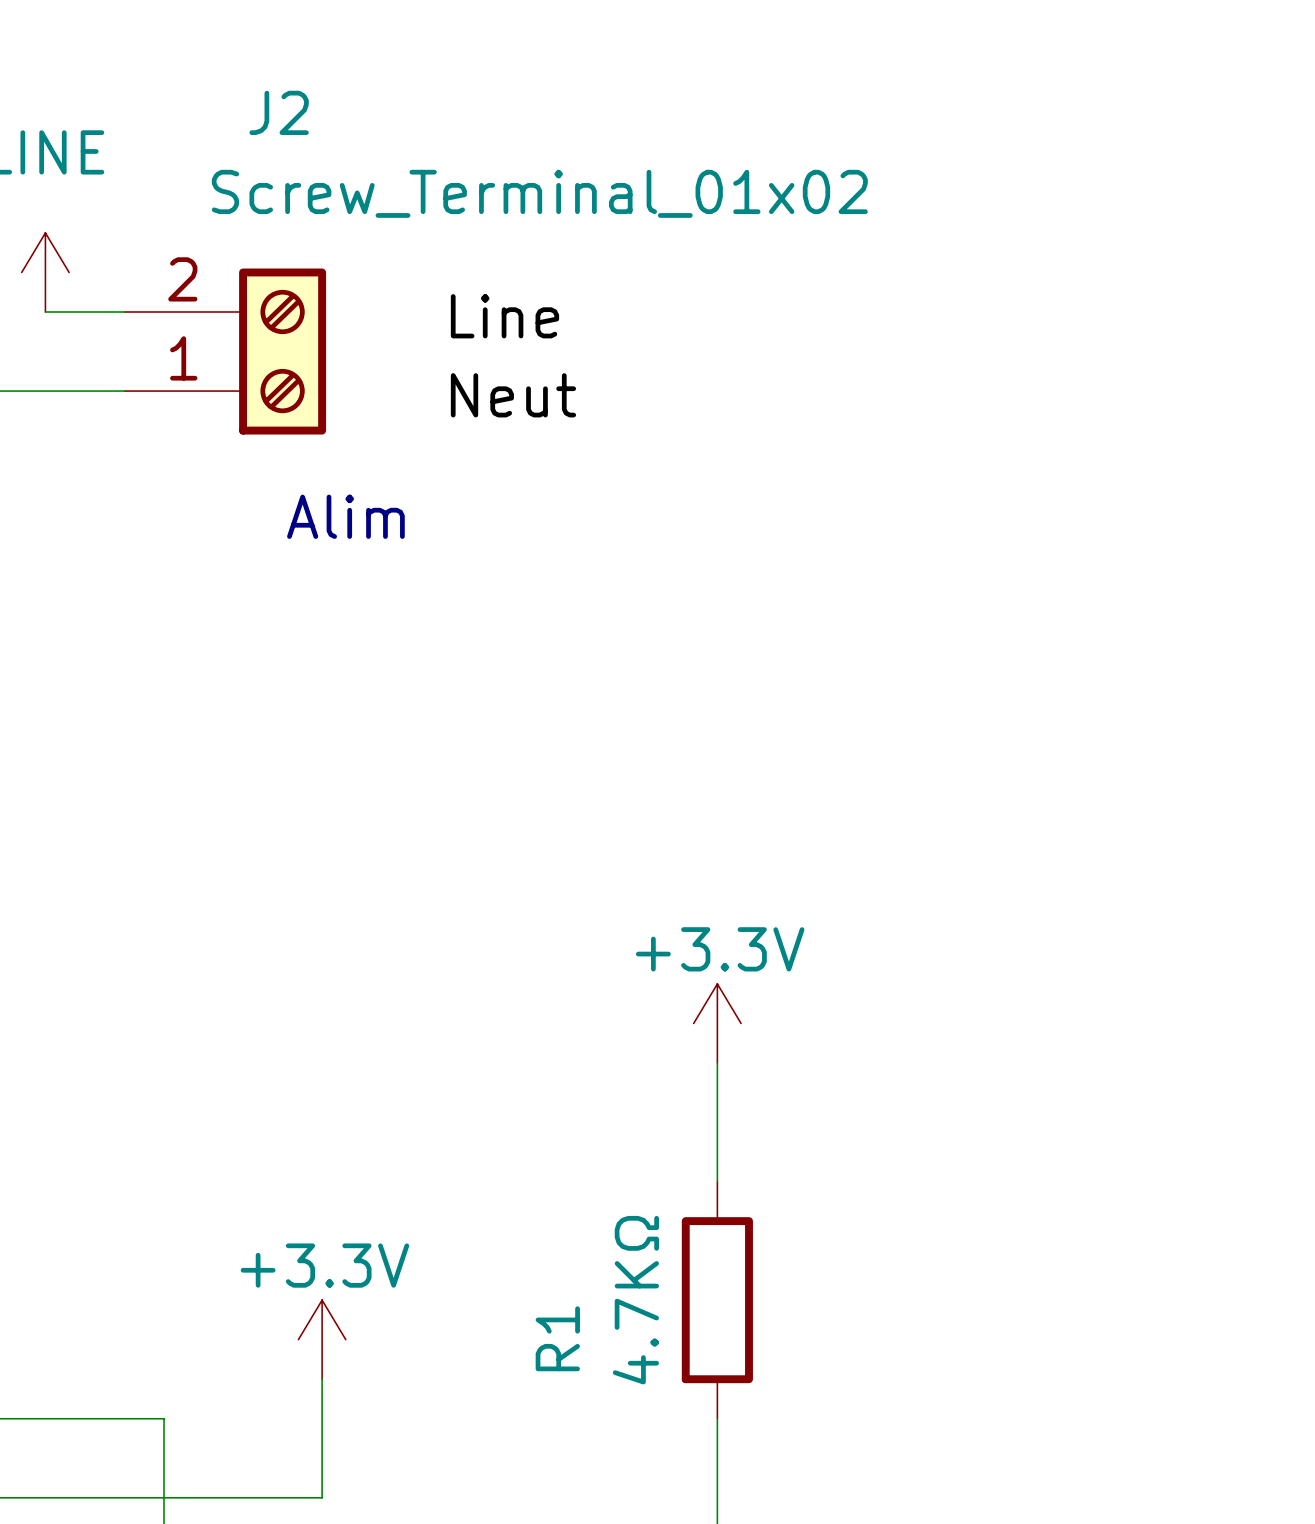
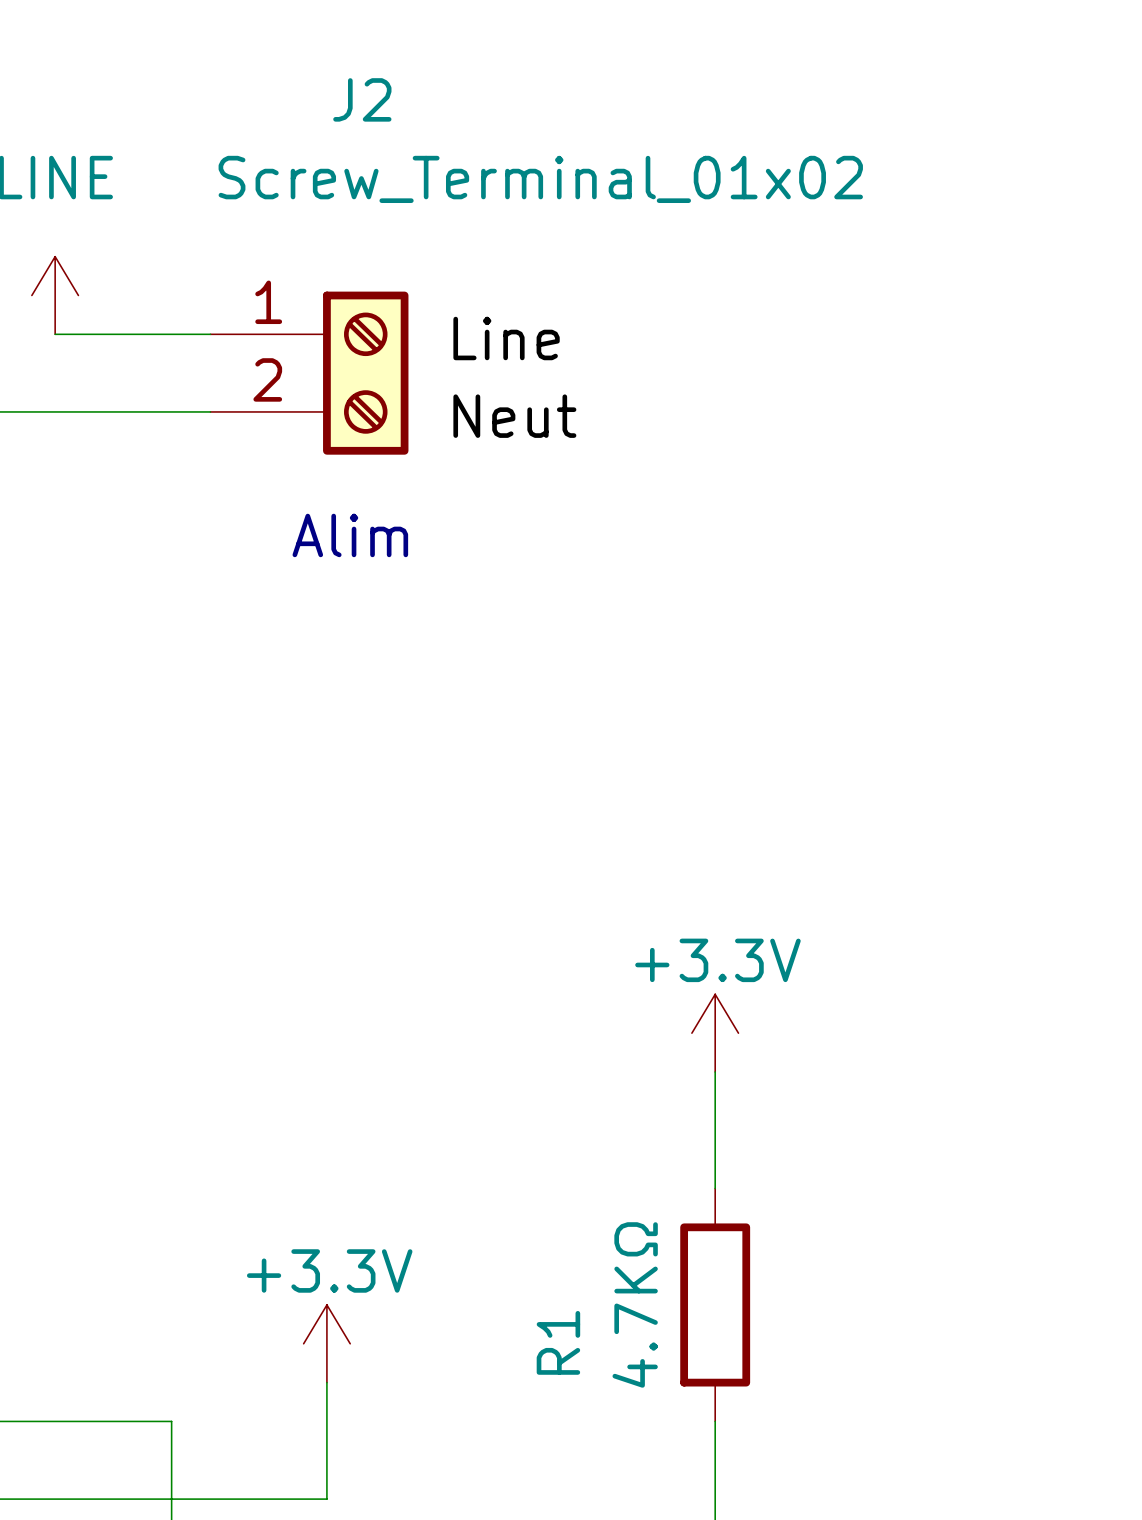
J2 value position: Screw_Terminal_01x02 (539, 193) -> Screw_Terminal_01x02 (540, 179)
J2 flip: as is (282, 351) -> up-down (365, 373)

